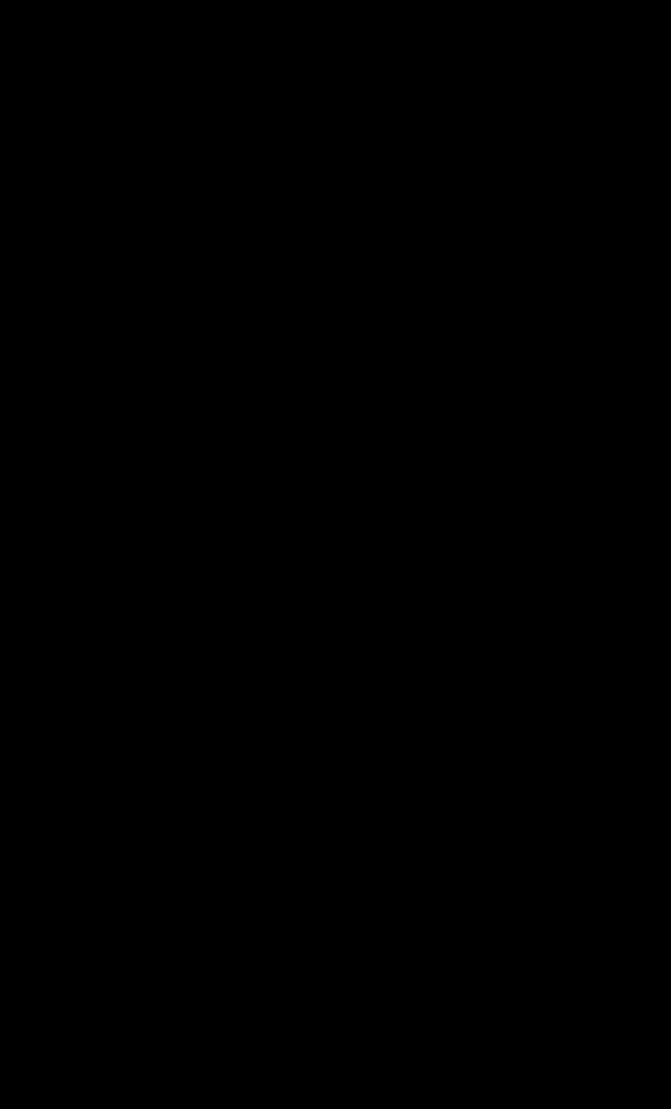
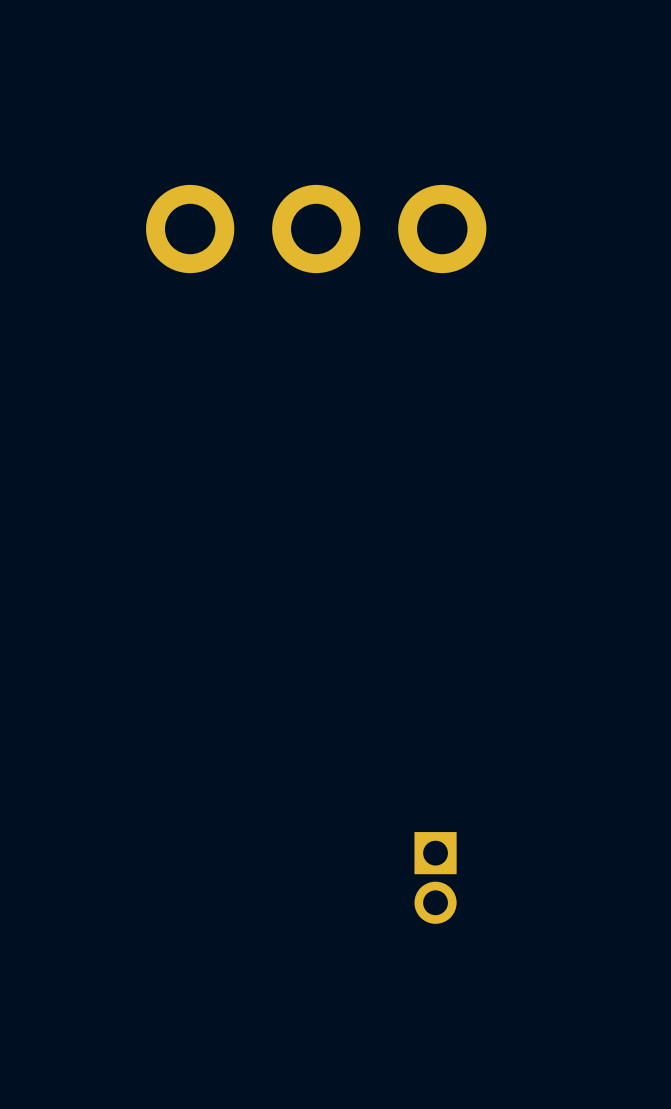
part: none -> (316, 229)
part: none -> (435, 877)

